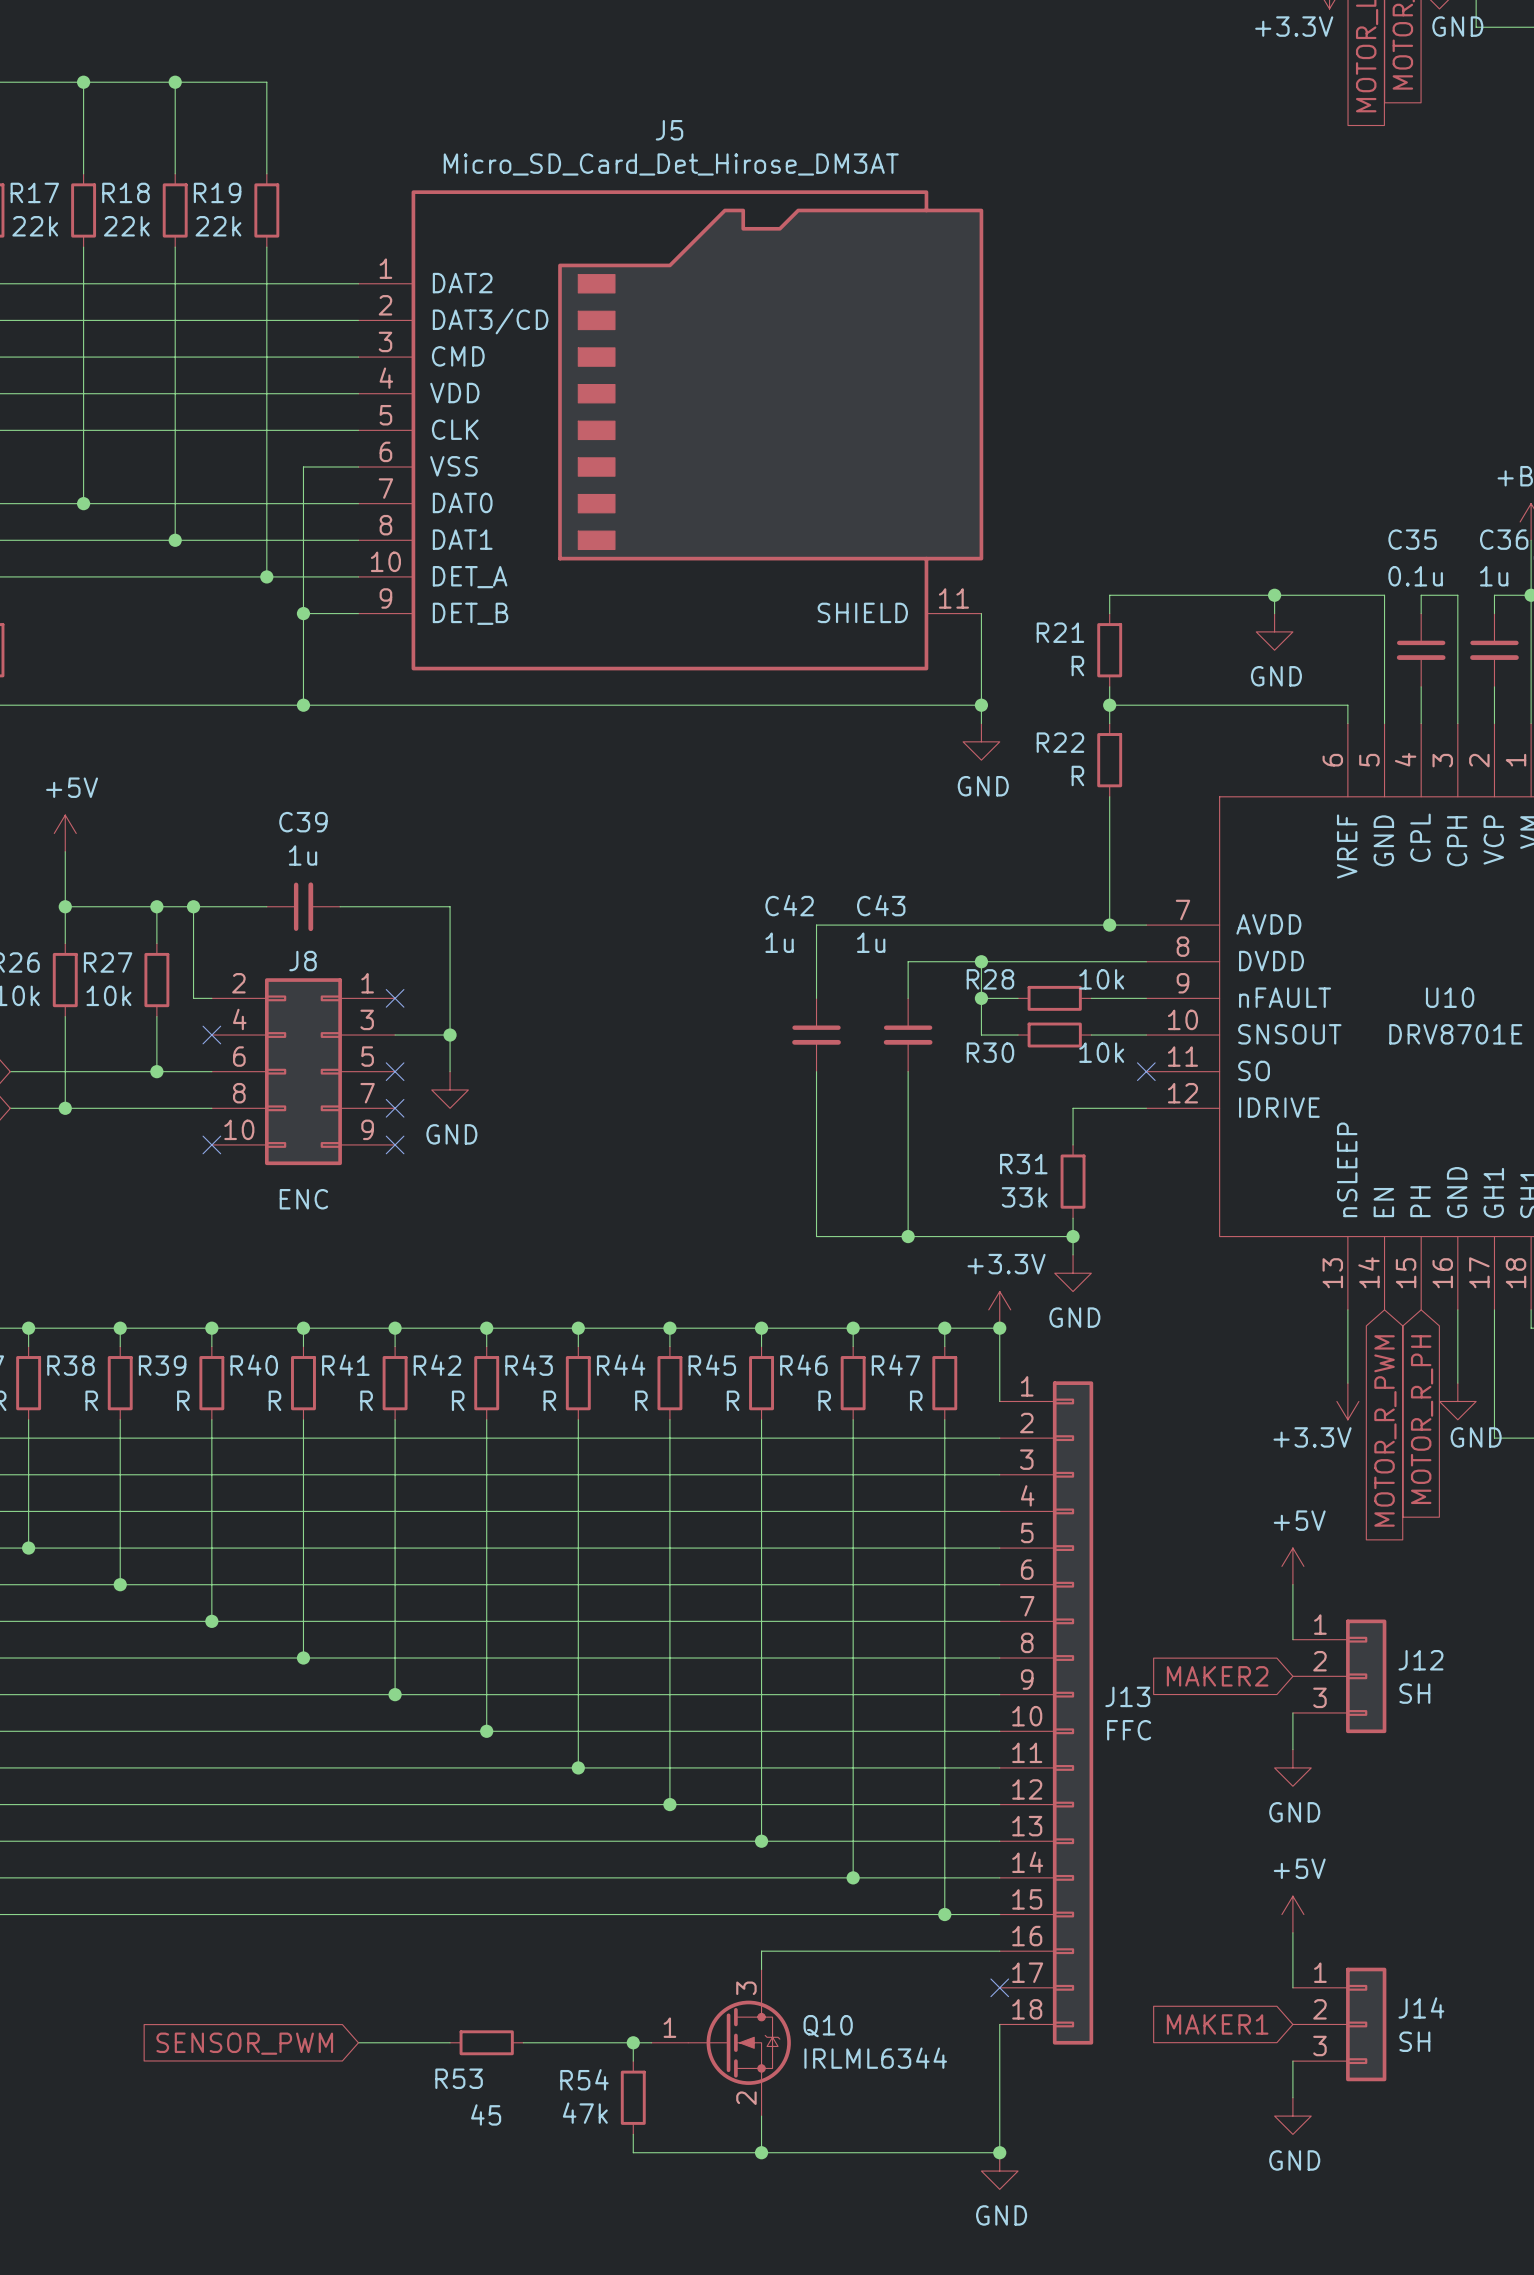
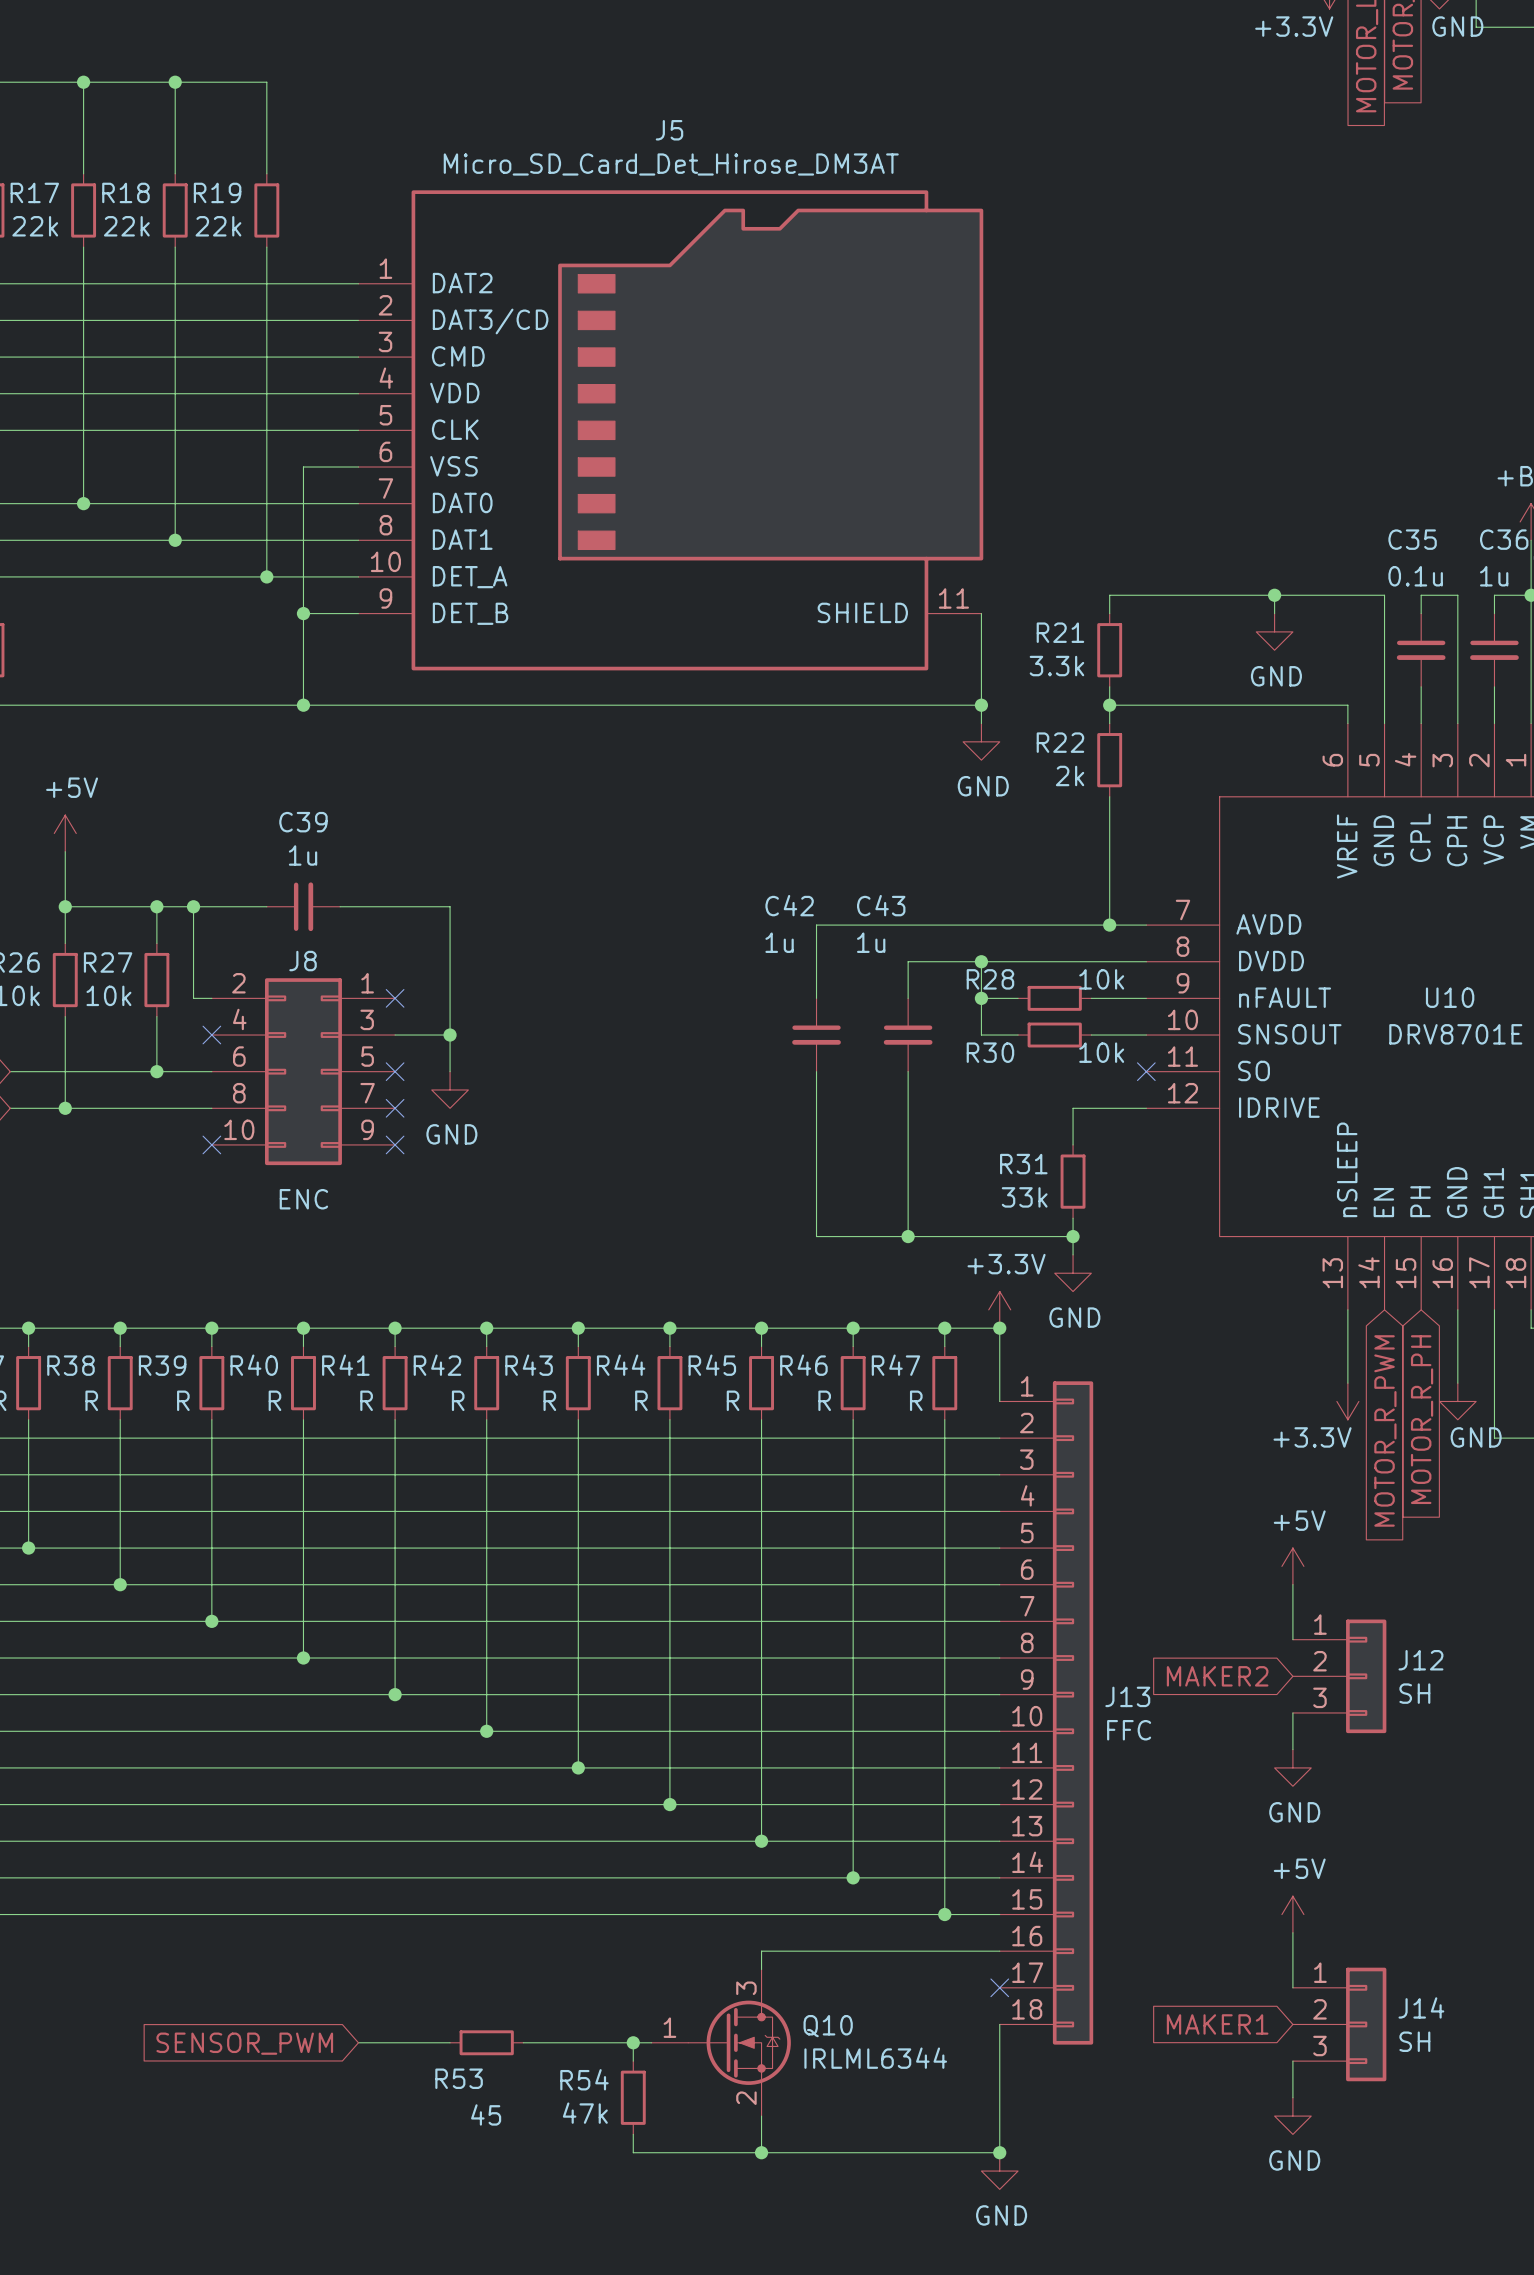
R21 value: R (1077, 666) -> 3.3k (1056, 666)
R22 value: R (1077, 775) -> 2k (1070, 775)

